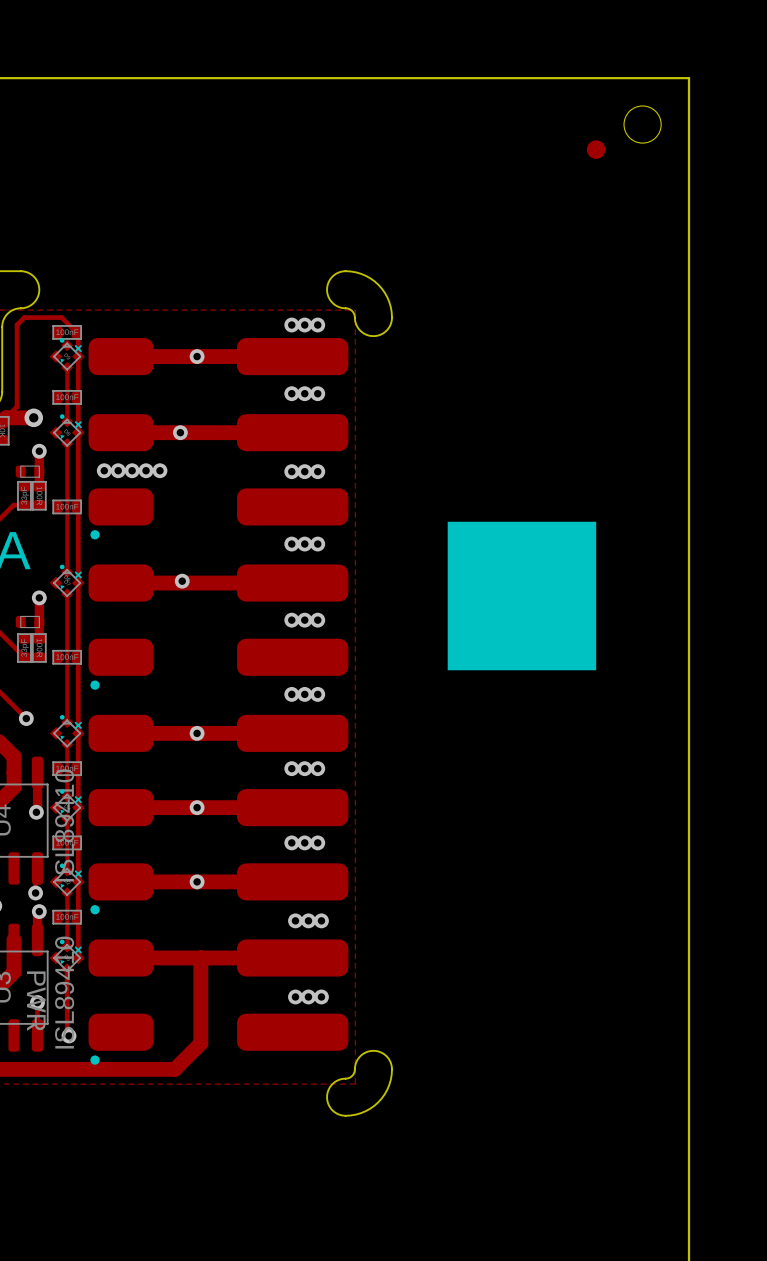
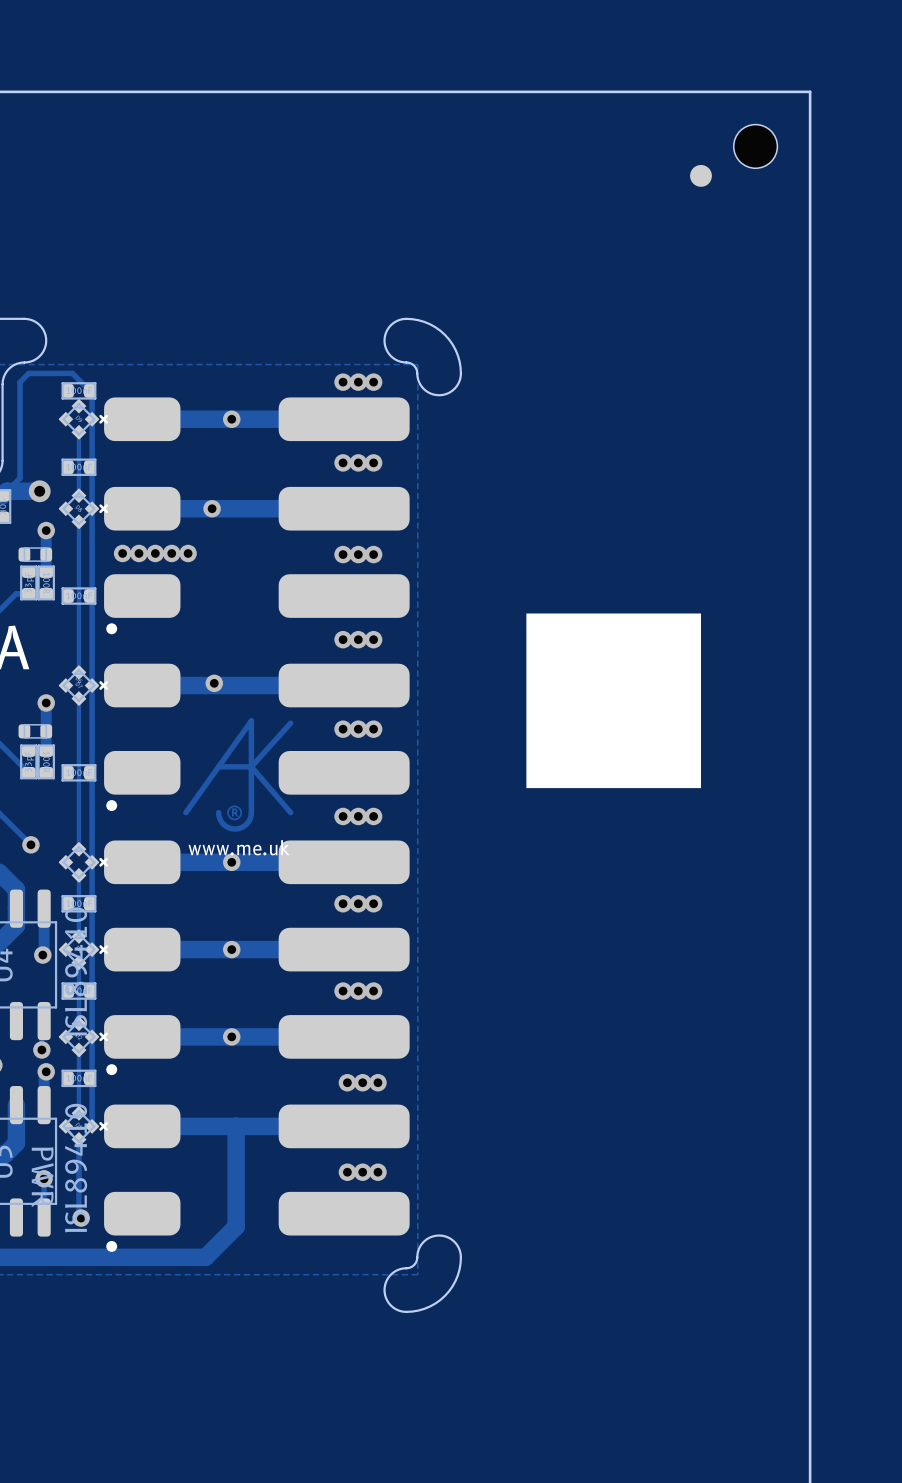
part footprint: [50, 338, 85, 374] -> [58, 399, 109, 440]
part footprint: [50, 414, 85, 450] -> [58, 488, 109, 529]
part footprint: [50, 564, 85, 600] -> [58, 665, 109, 706]
drawing: none -> [183, 718, 294, 832]
part footprint: [50, 714, 85, 751] -> [58, 842, 109, 883]
part footprint: [50, 789, 85, 825] -> [58, 929, 109, 970]
part footprint: [50, 863, 85, 899] -> [58, 1016, 109, 1058]
part footprint: [50, 939, 85, 975] -> [58, 1106, 109, 1147]

